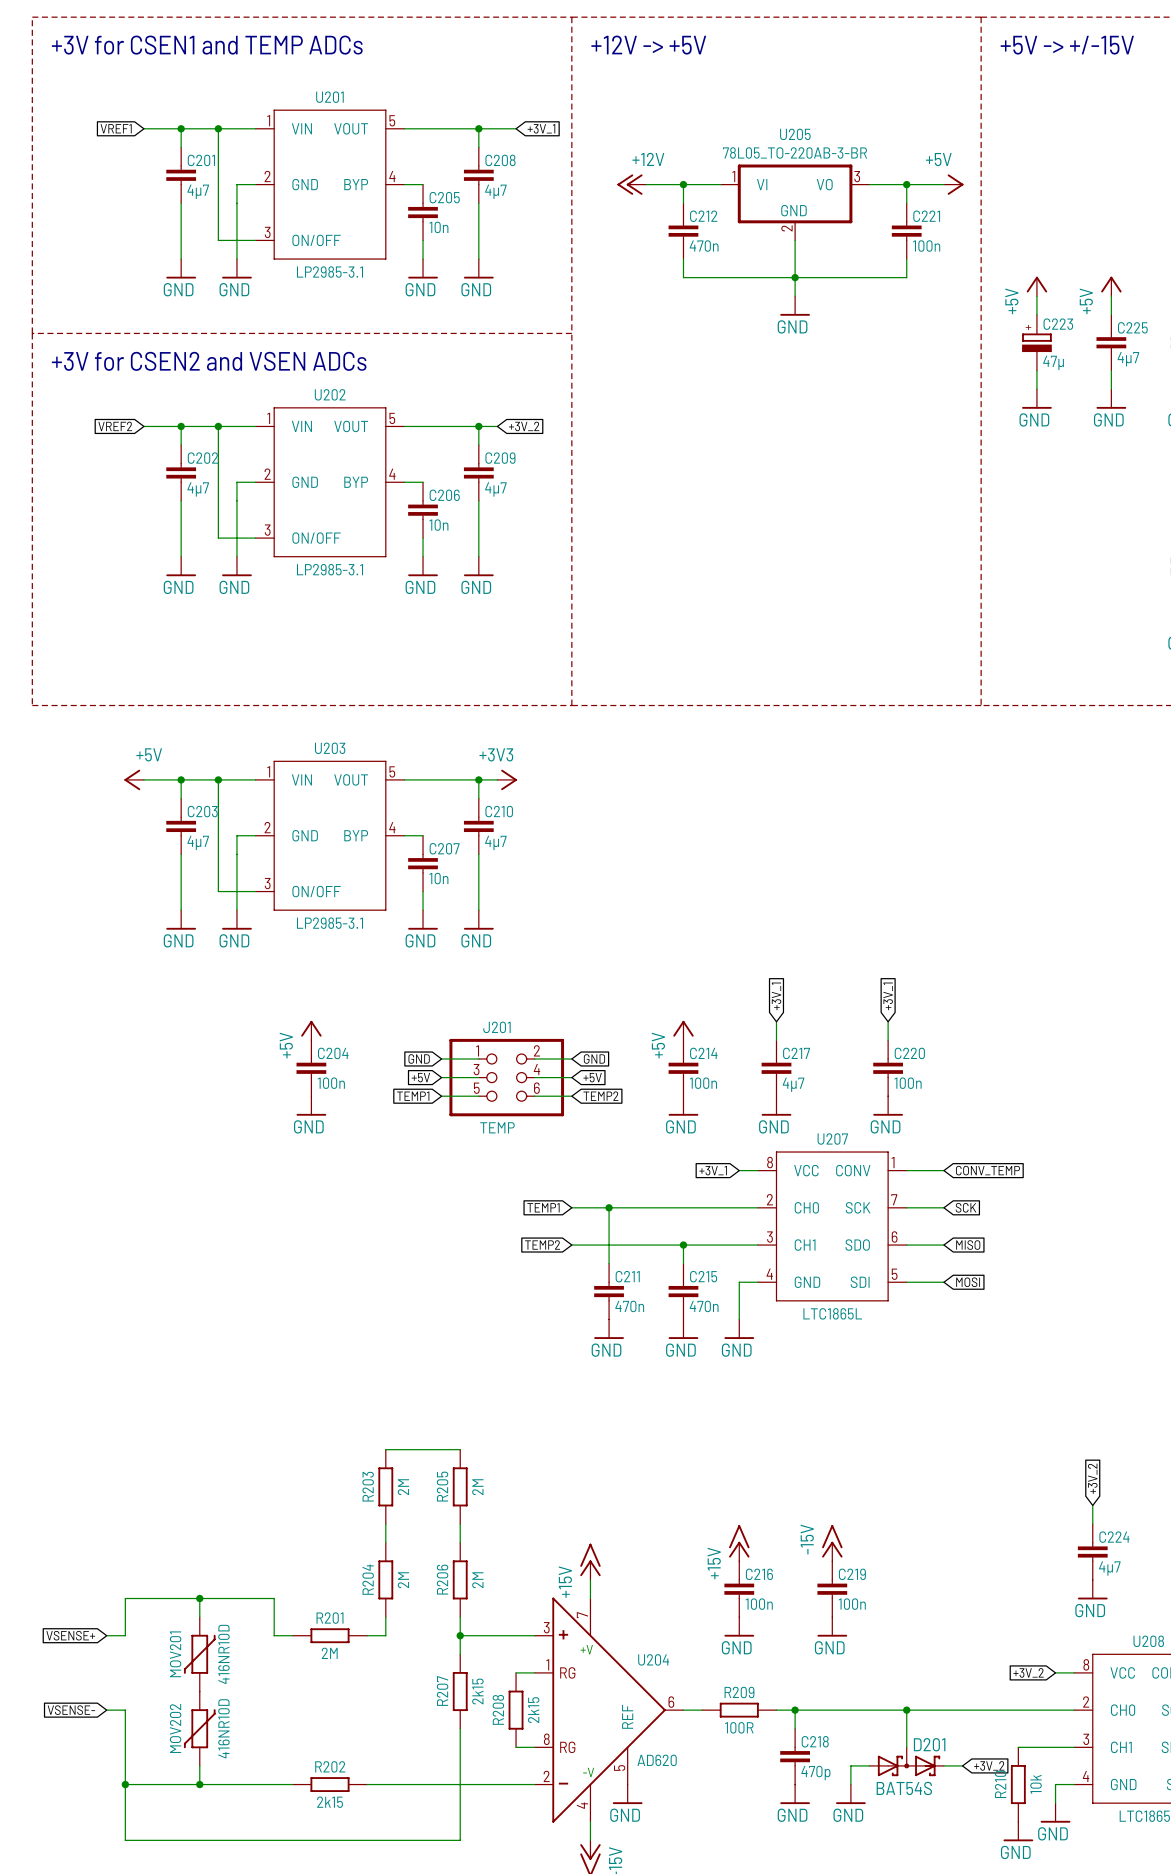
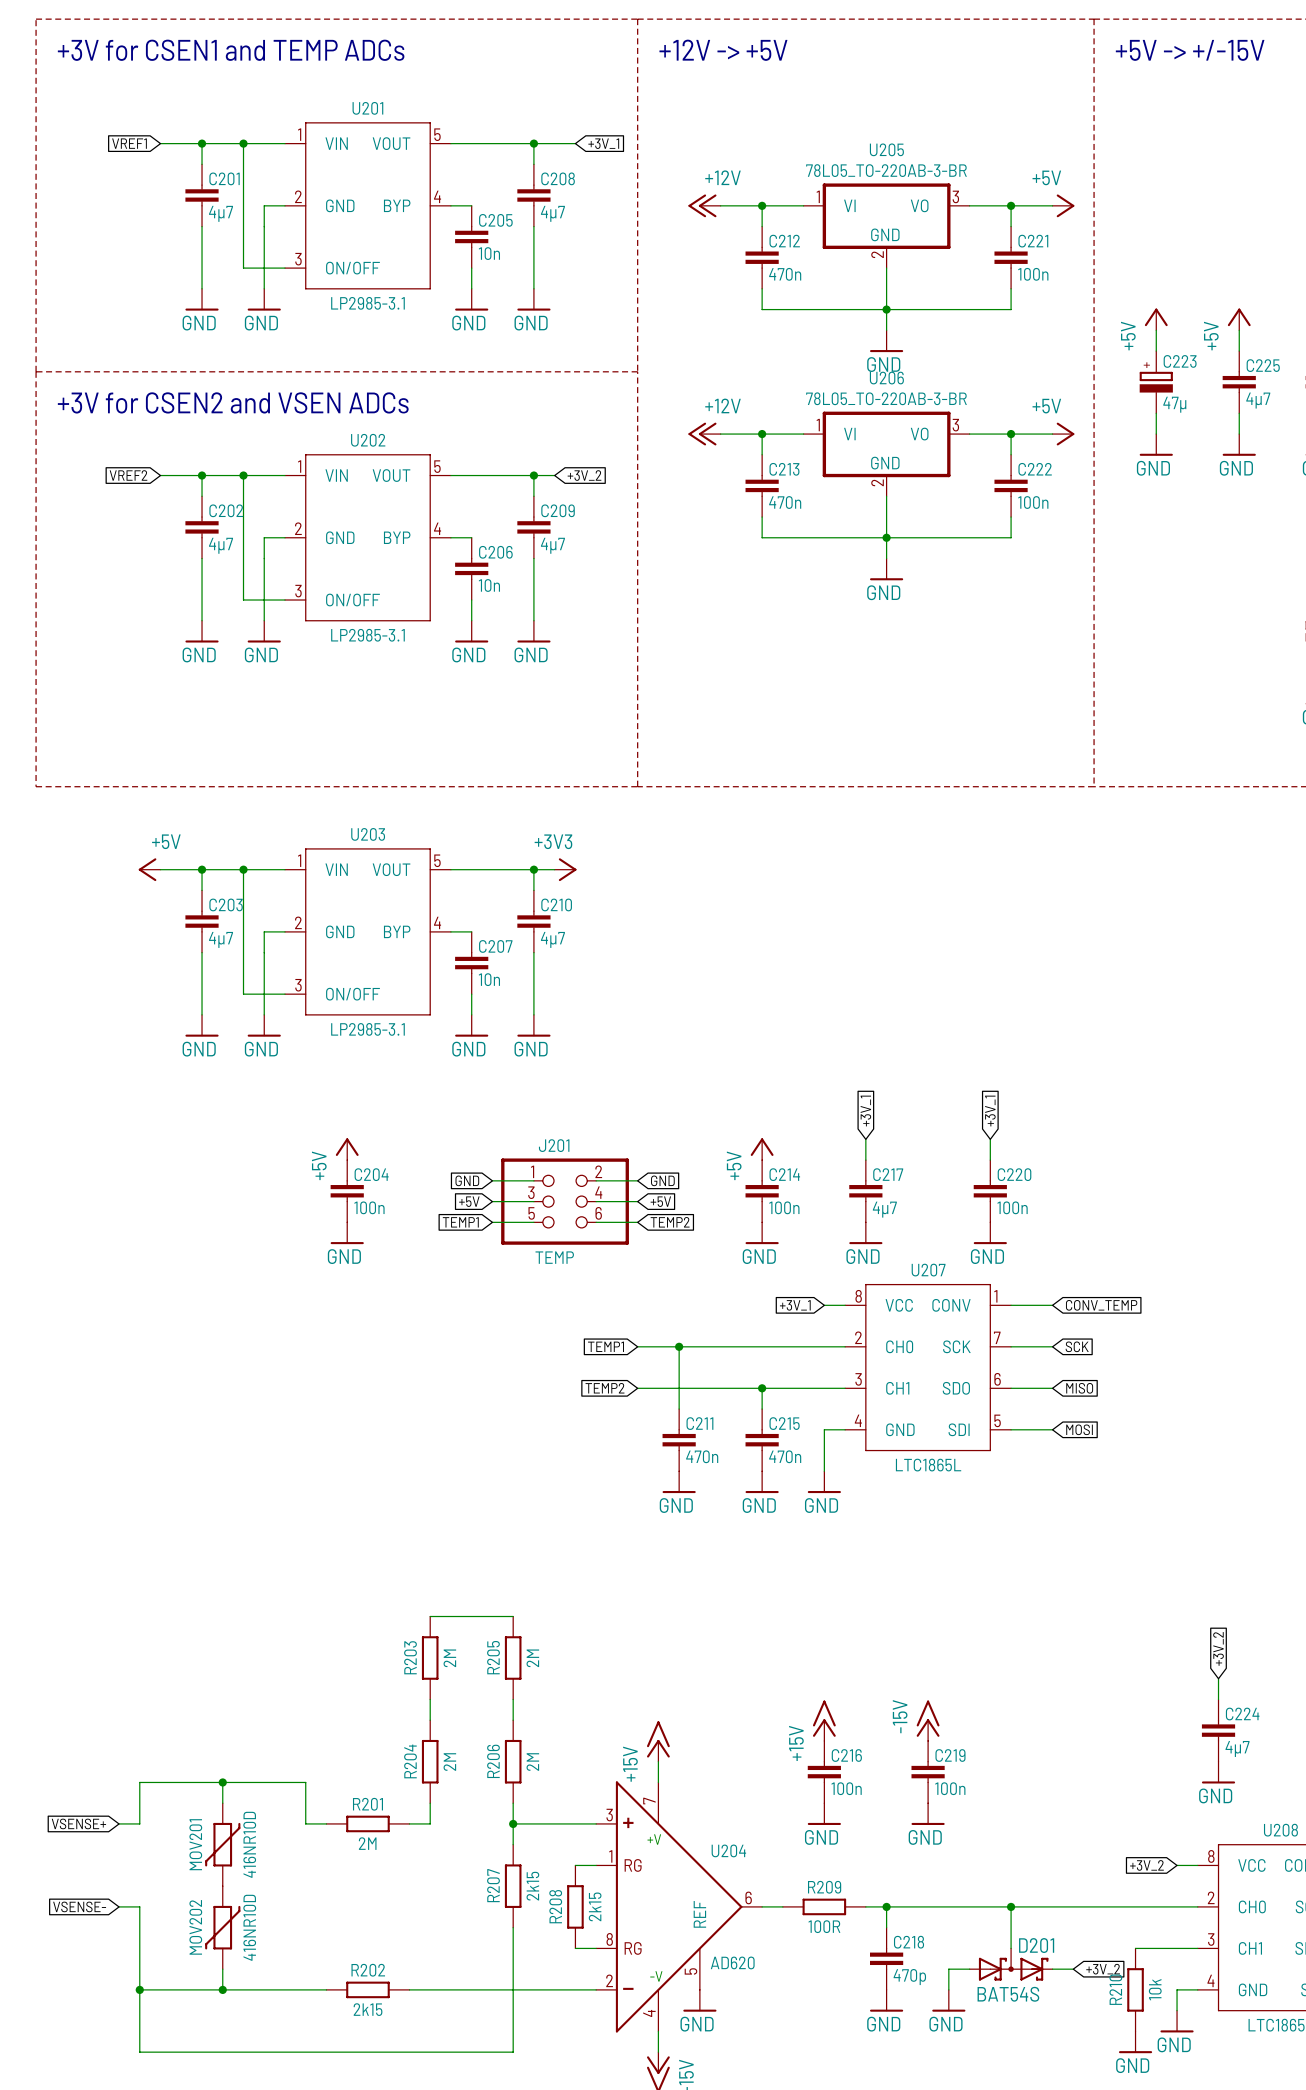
power symbol: none -> +12V (704, 434)
wire: none -> (720, 434) (803, 434)
wire: none -> (762, 434) (762, 454)
junction: none -> (762, 434)
wire: none -> (969, 434) (1052, 434)
wire: none -> (1011, 434) (1011, 454)
junction: none -> (1011, 434)
power symbol: none -> +5V (1063, 434)
U206: none -> 78L05_TO-220AB-3-BR (886, 453)
C213: none -> 470n (762, 485)
C222: none -> 100n (1011, 485)
wire: none -> (886, 496) (886, 558)
wire: none -> (762, 517) (762, 537) (1011, 537) (1011, 517)
junction: none -> (886, 537)
power symbol: none -> GND (886, 569)

